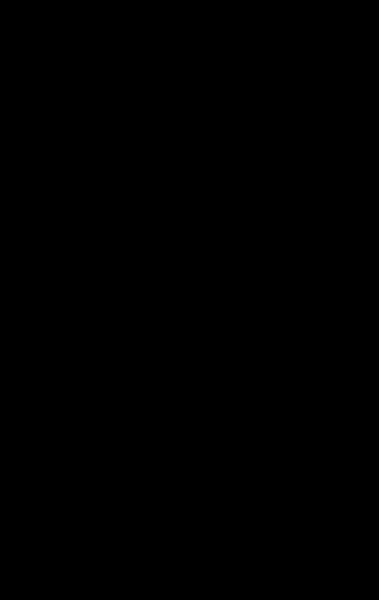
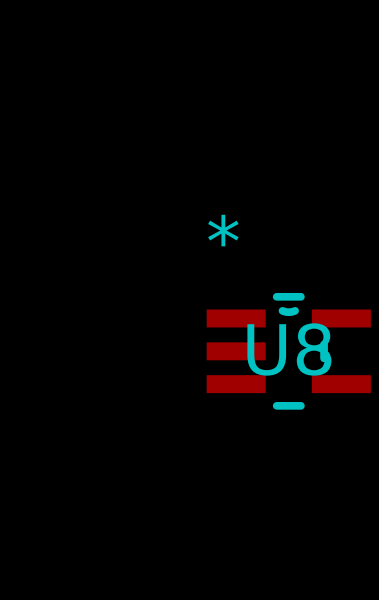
U8: none -> (288, 351)

